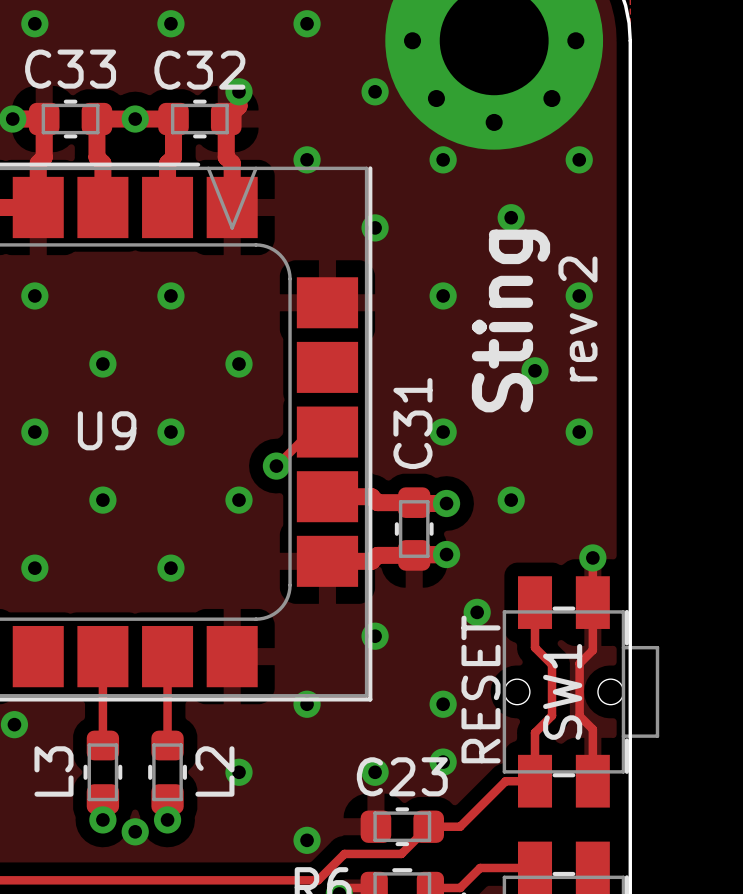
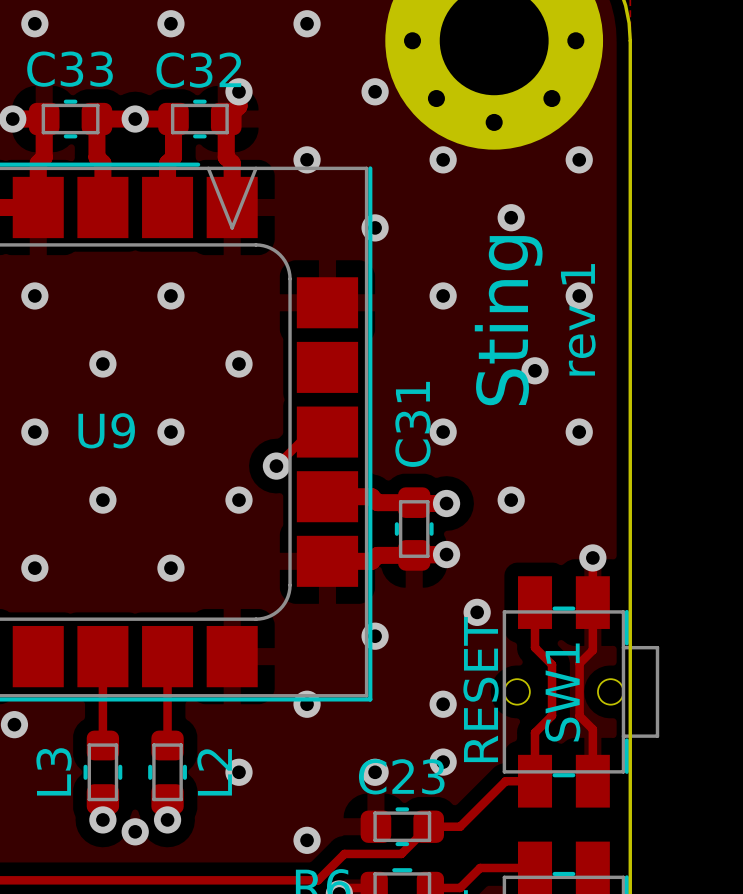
text: rev 2 (577, 318) -> rev 1 (578, 319)

